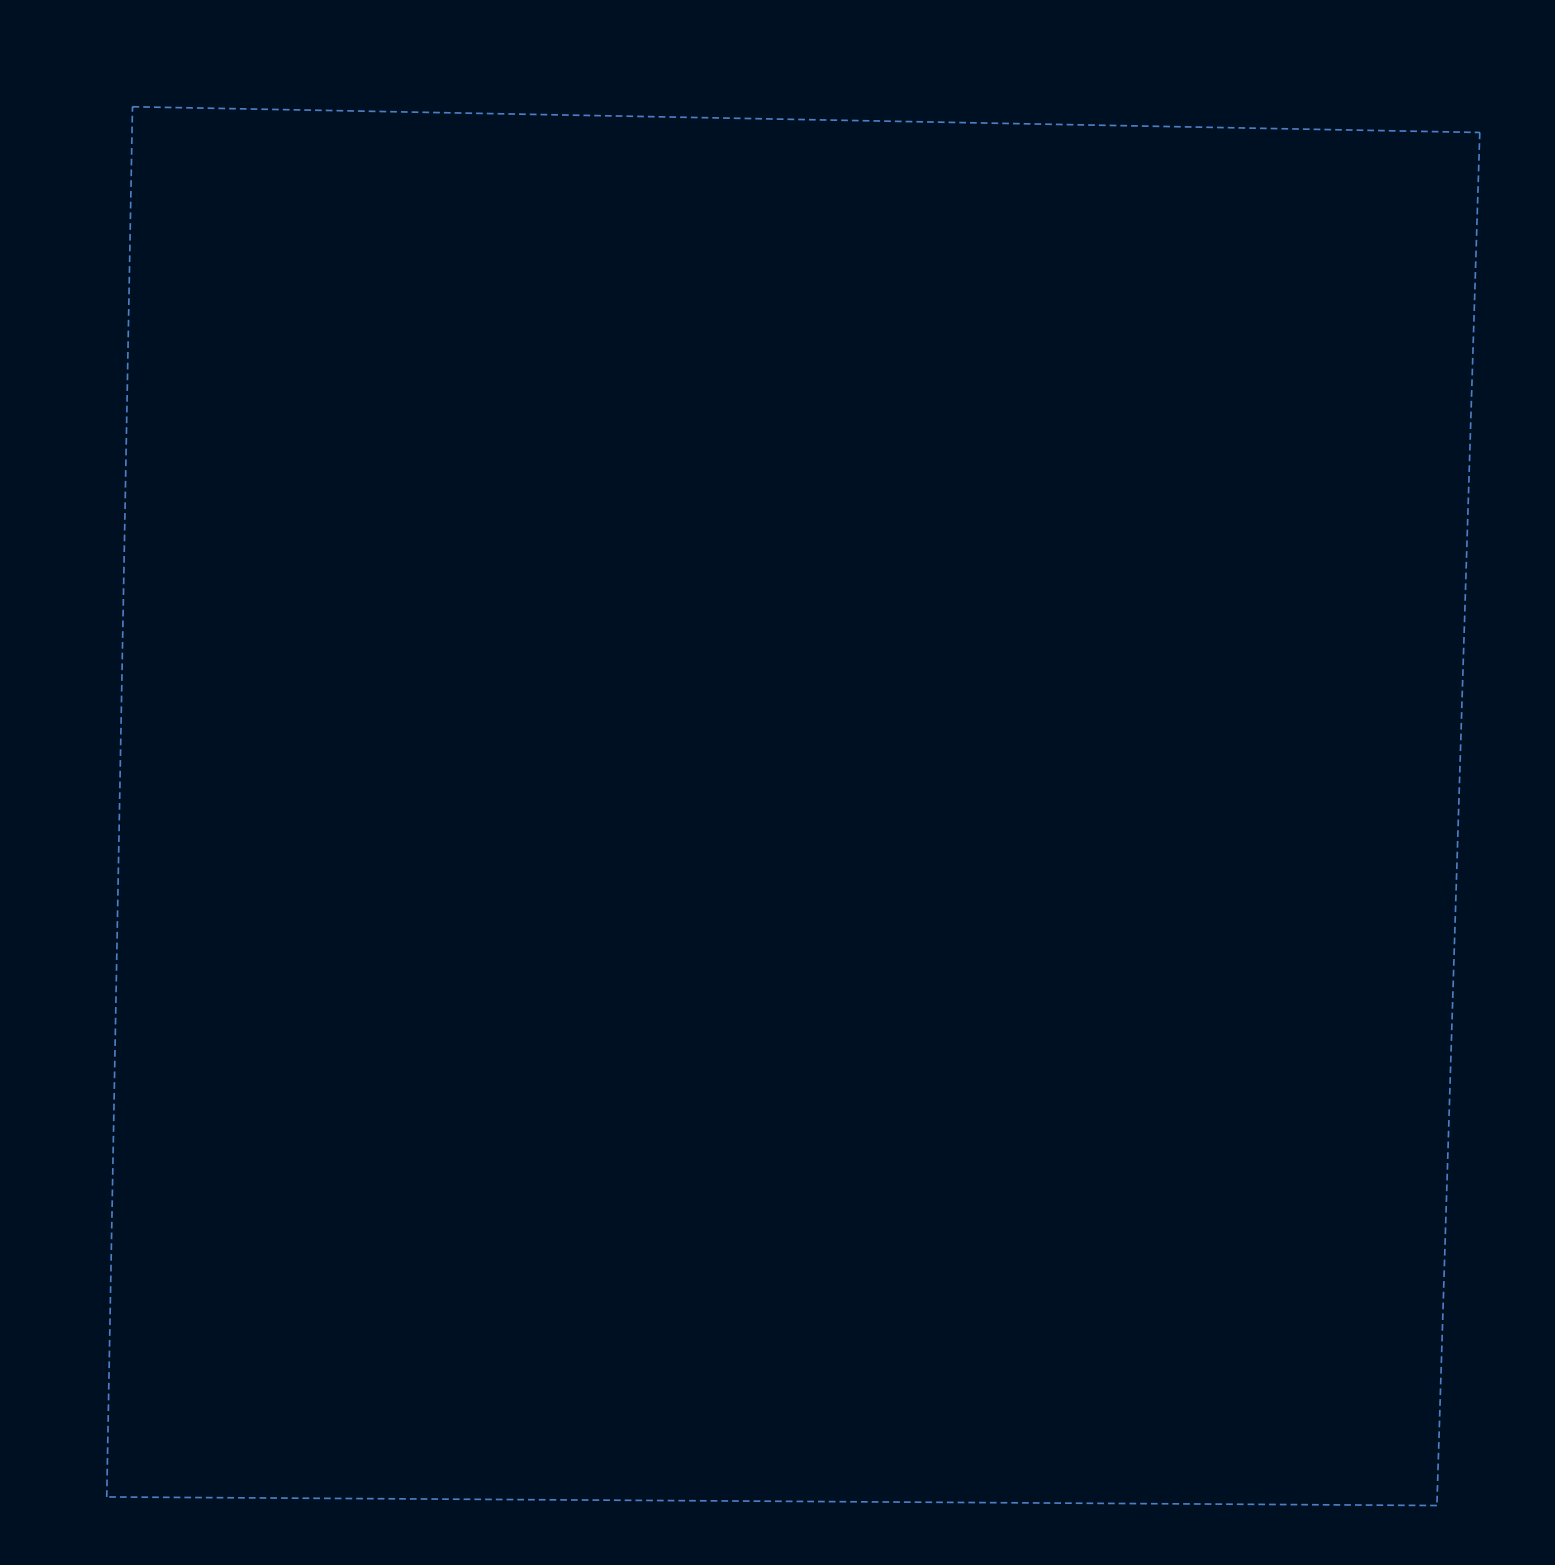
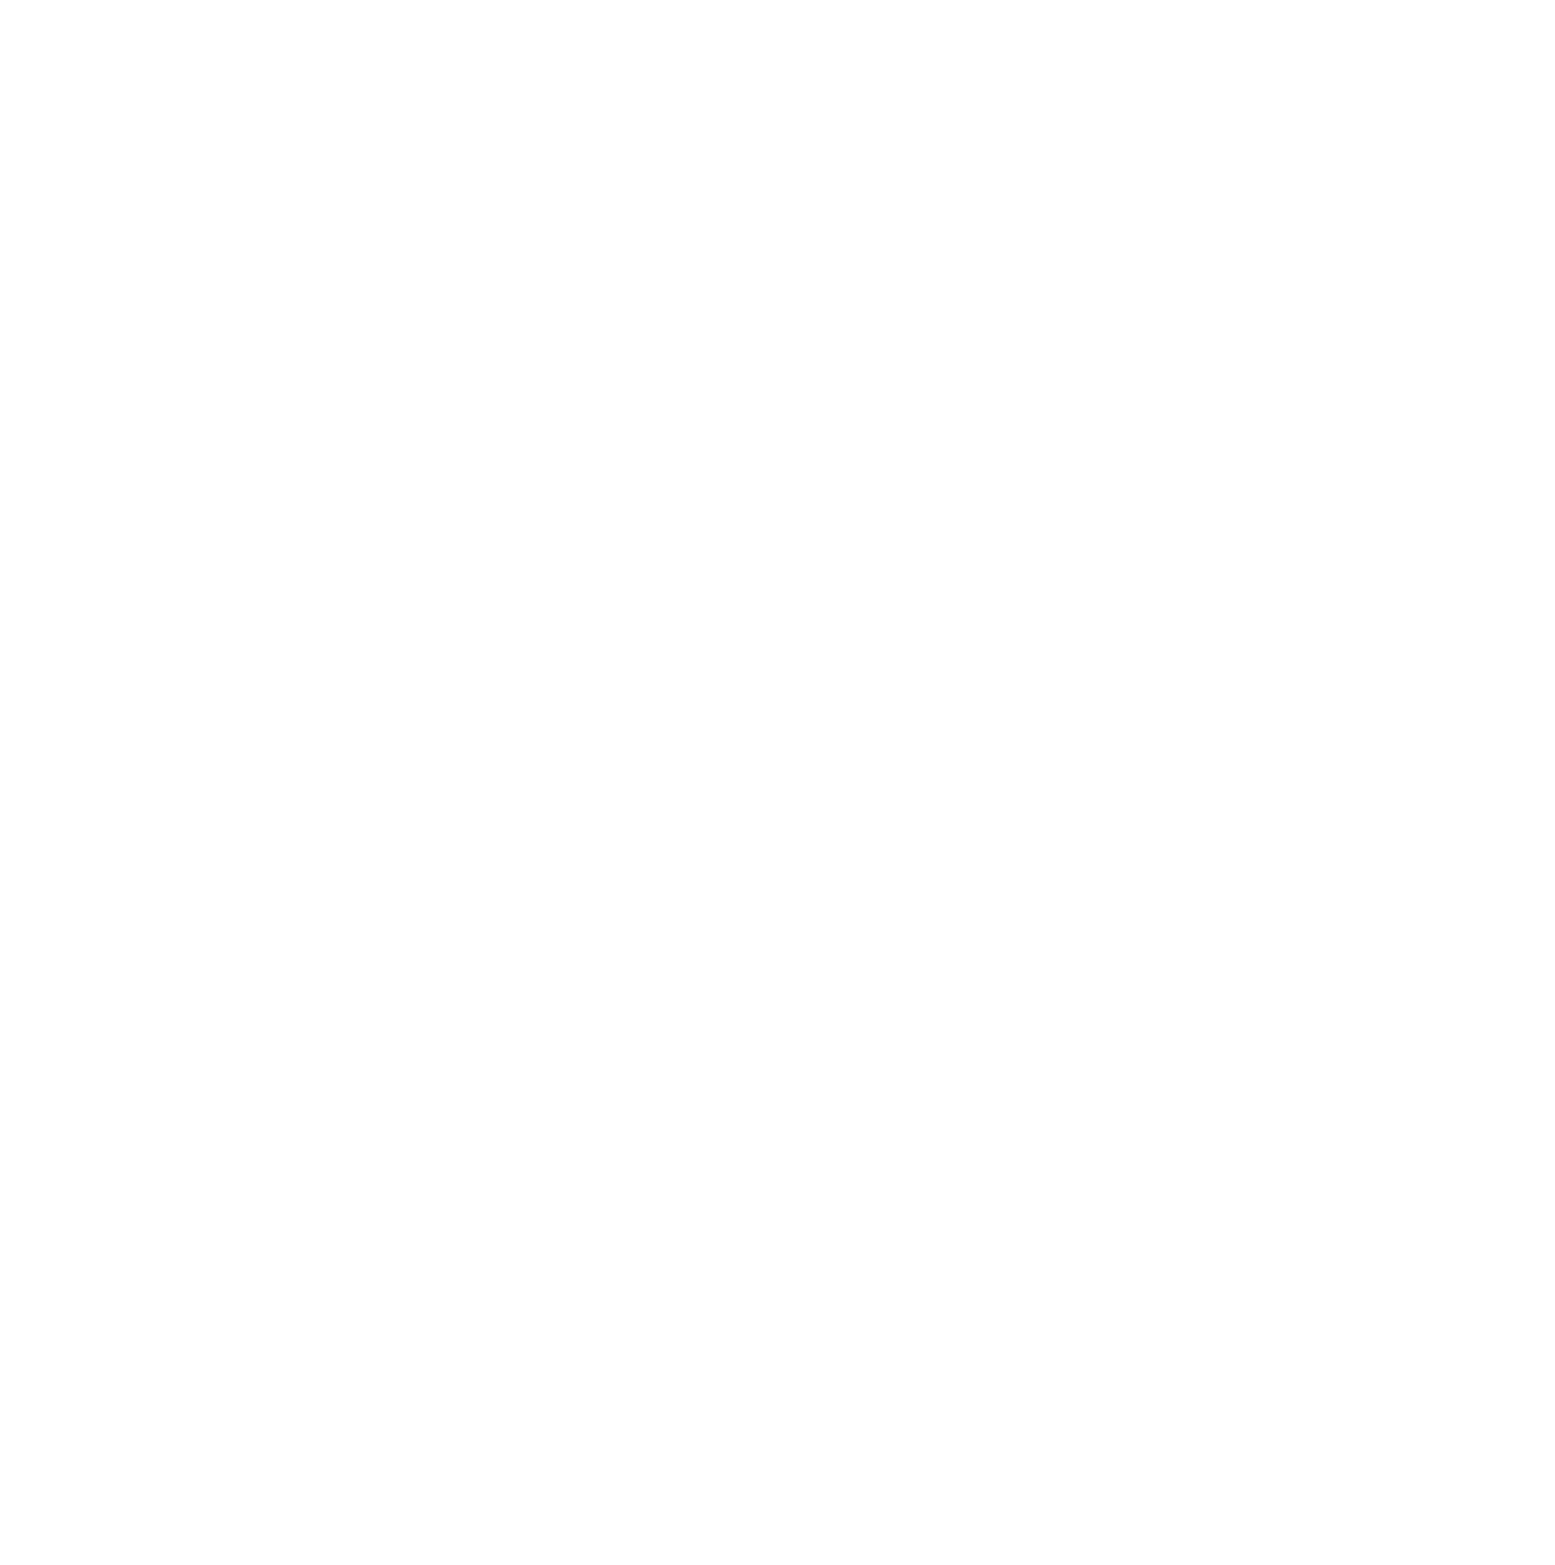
zone outline: (132, 106) (106, 1496) (1436, 1505) (1479, 132) (132, 106) -> none

